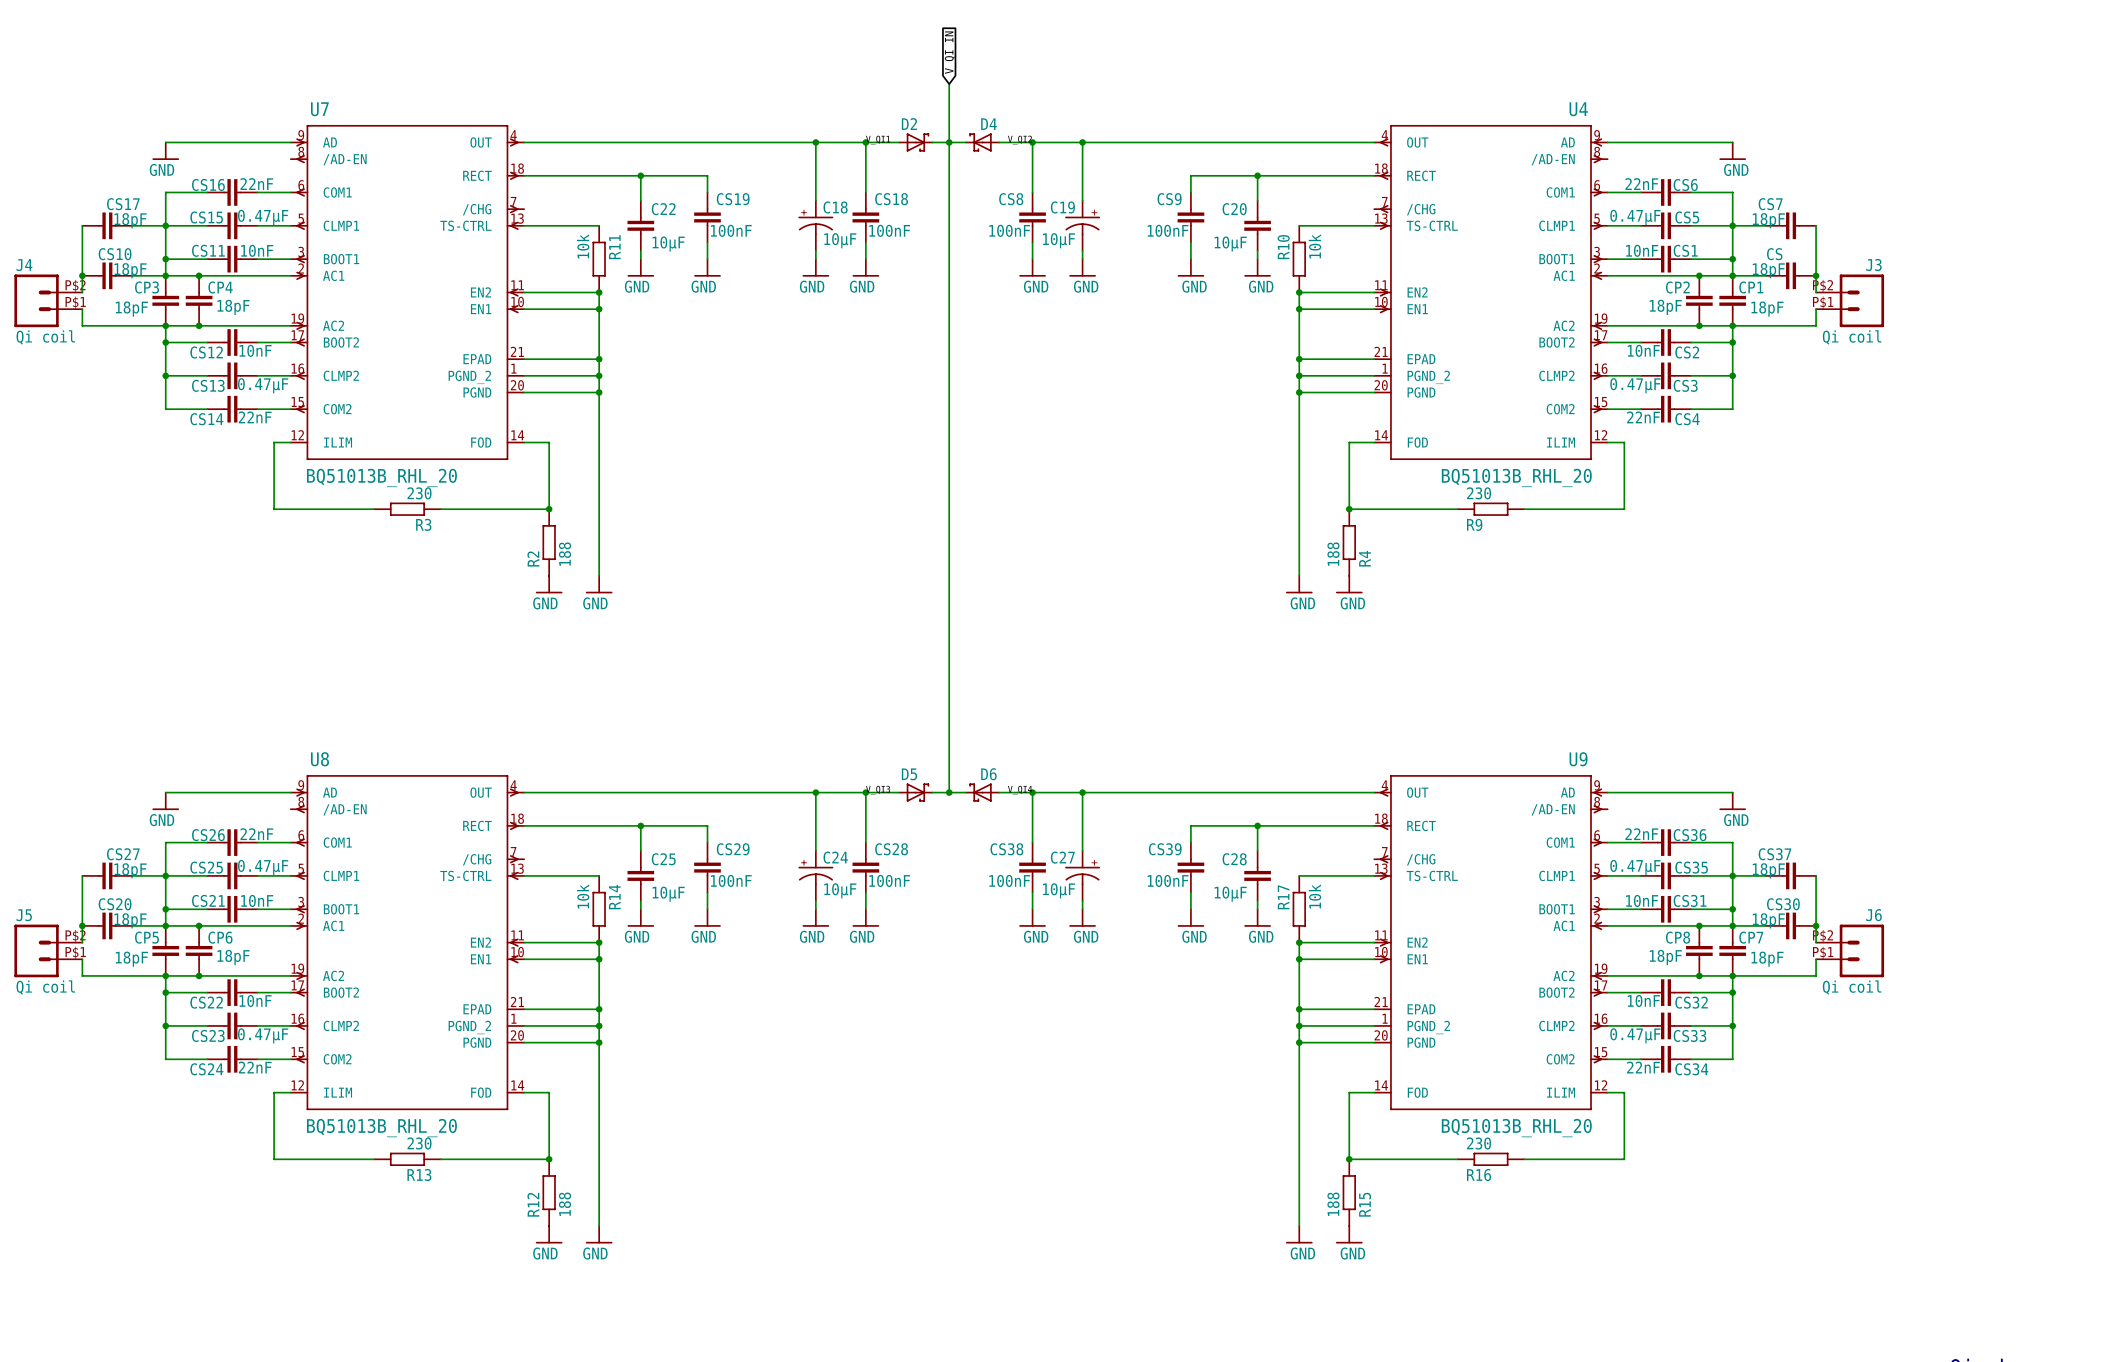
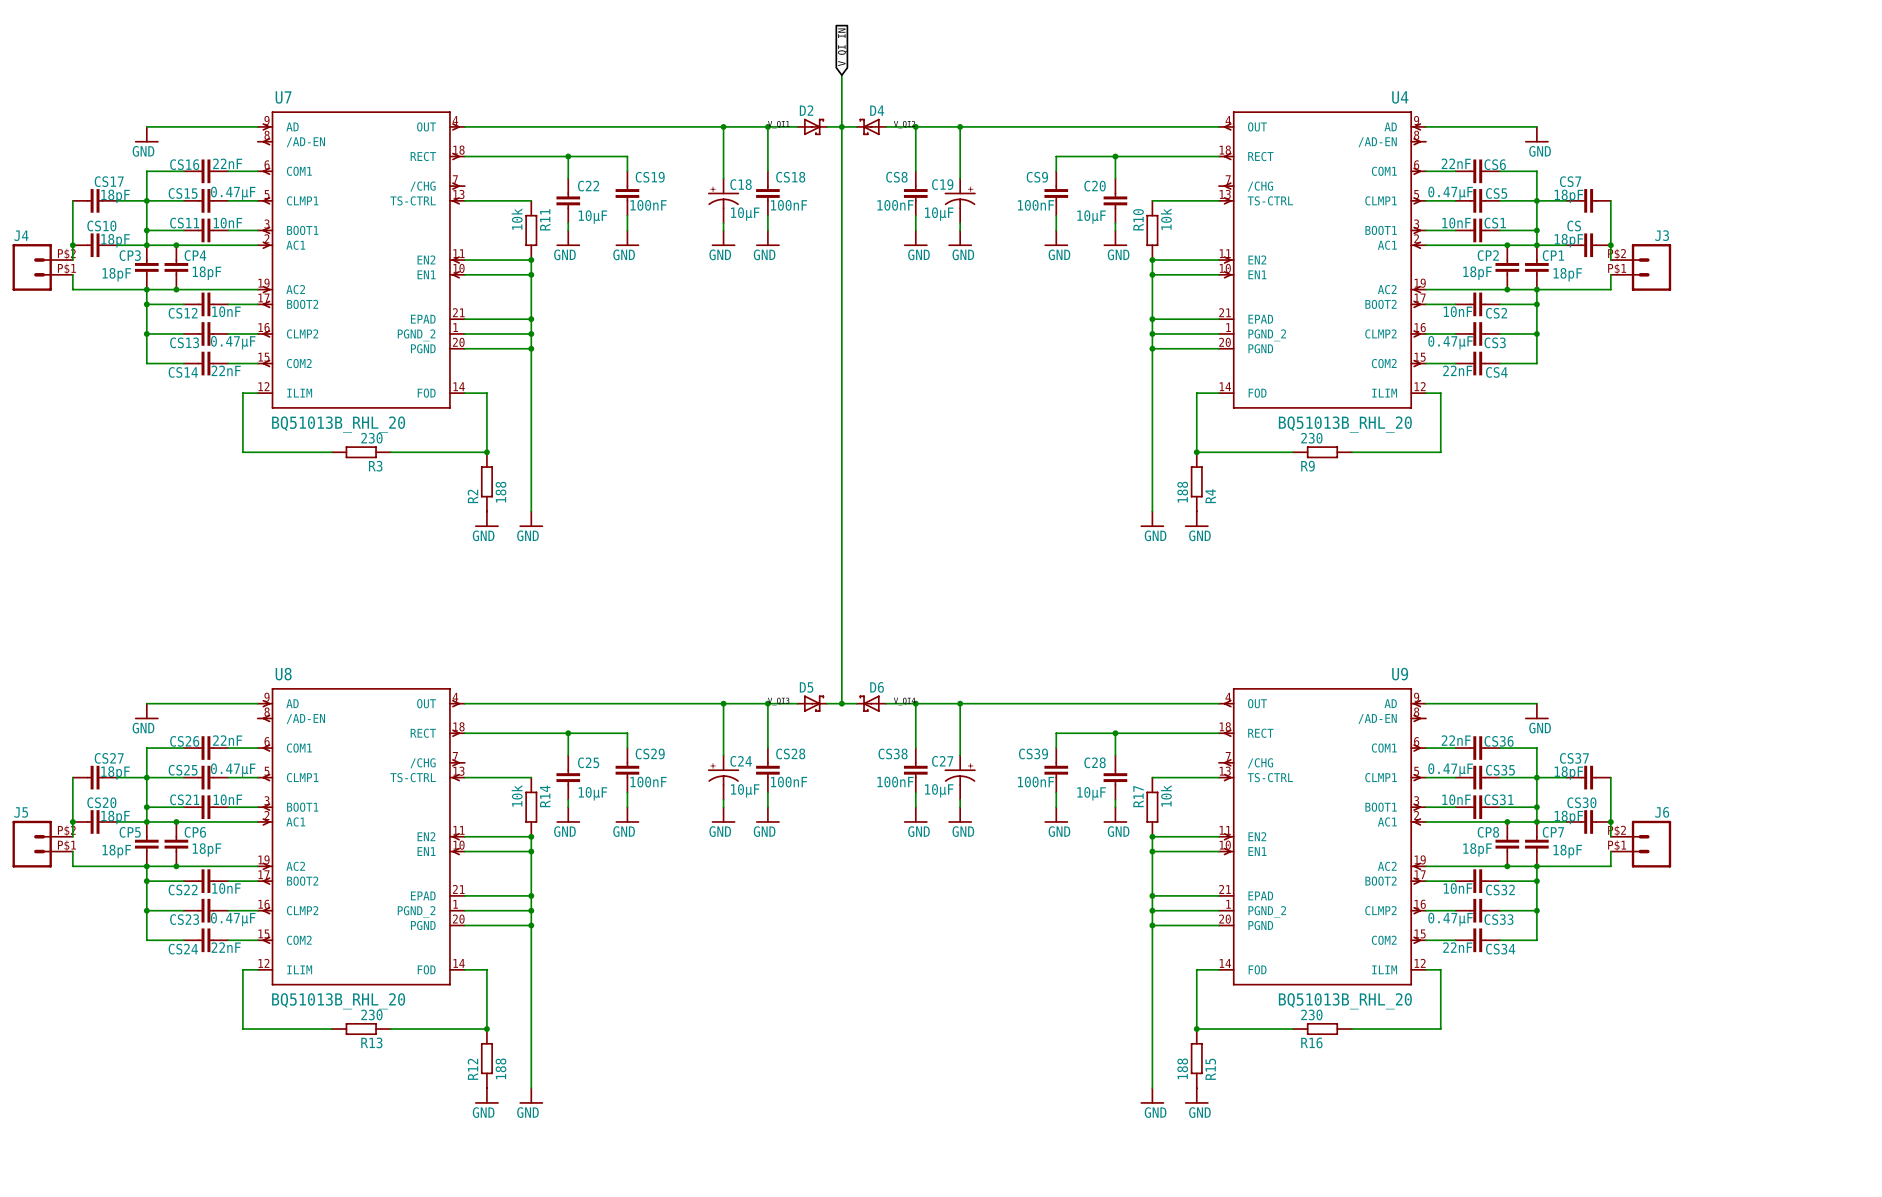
J4 value: Qi coil (45, 337) -> none
J3 value: Qi coil (1852, 337) -> none
J5 value: Qi coil (45, 987) -> none
J6 value: Qi coil (1852, 987) -> none

